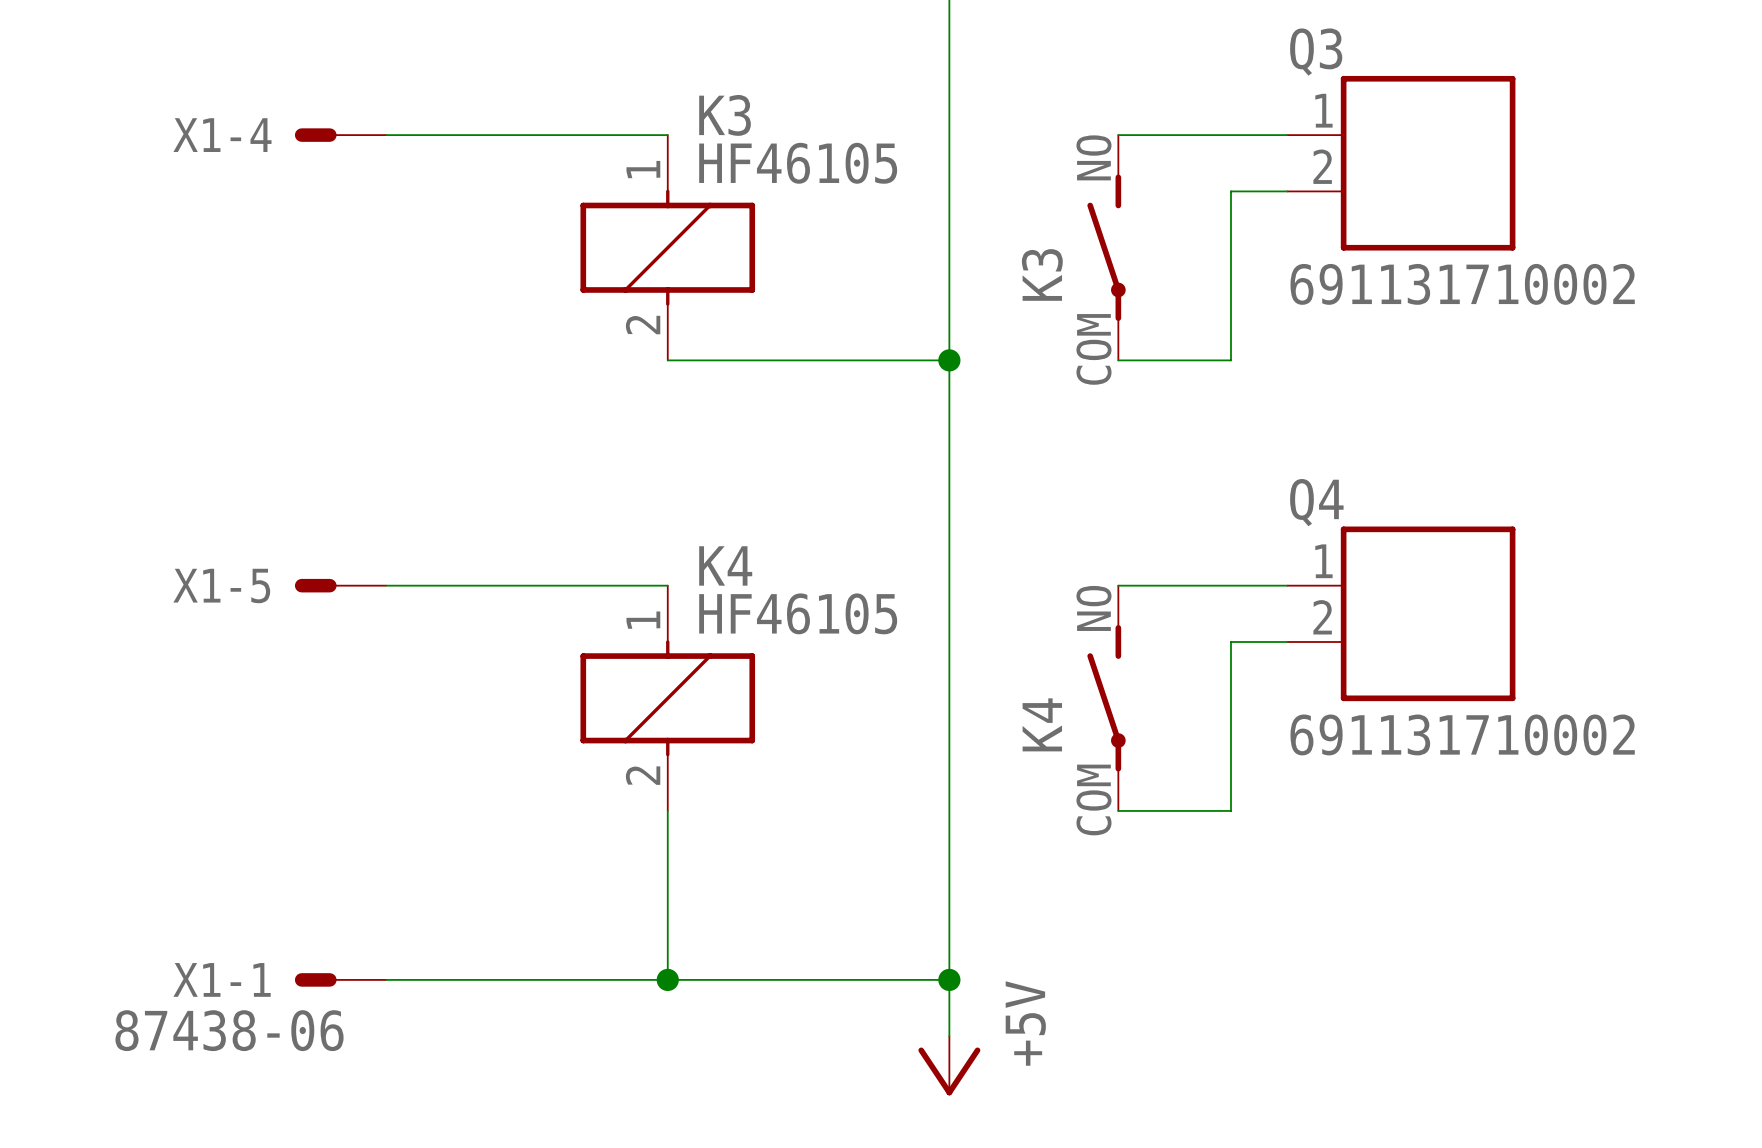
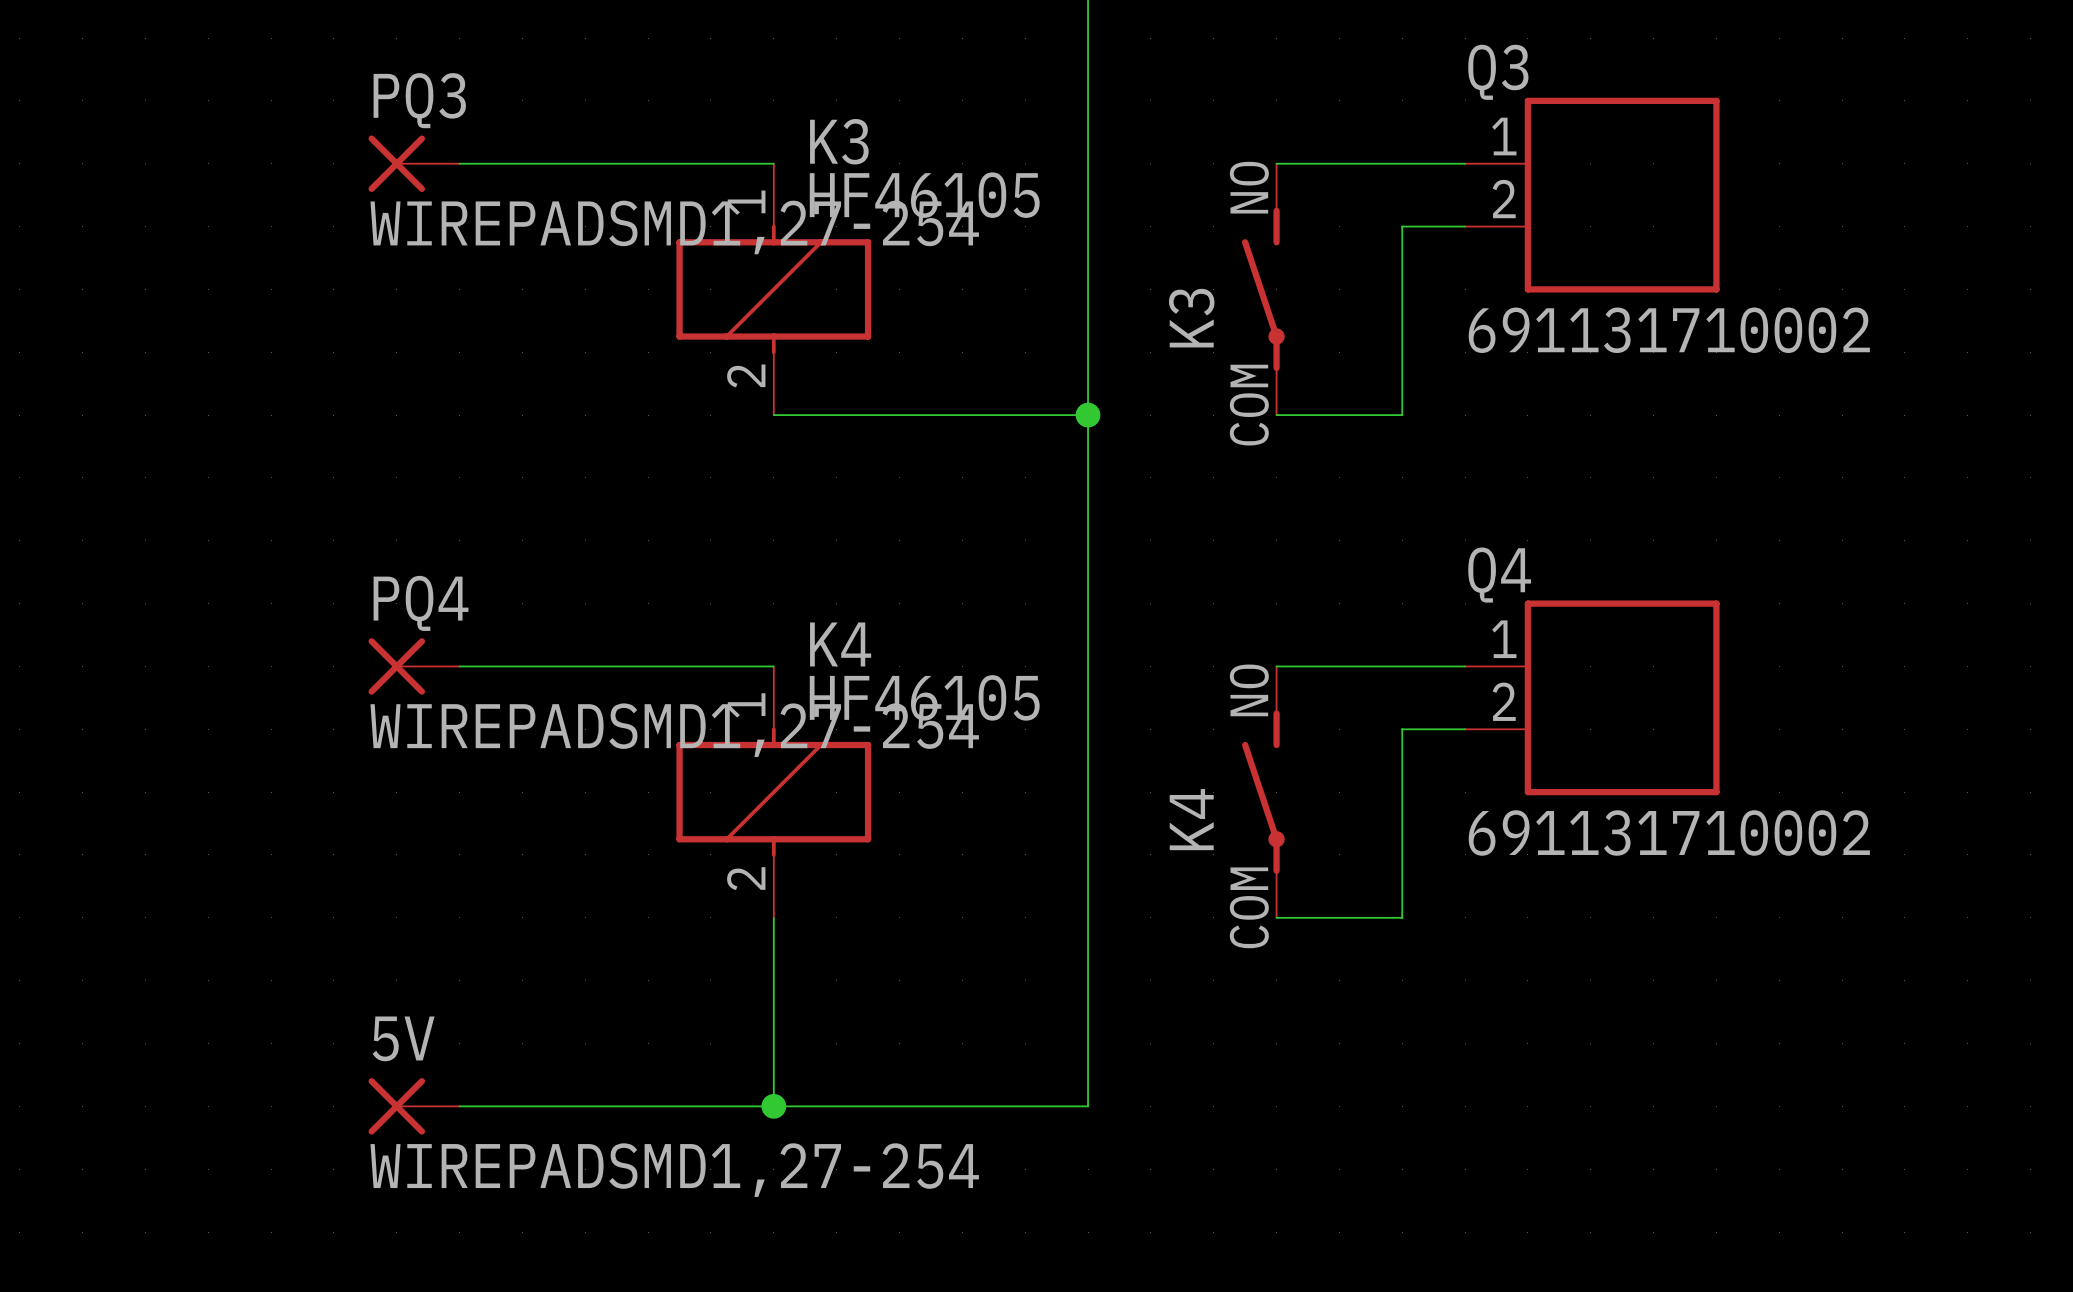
X1-4: (340, 135) -> none
PQ3: none -> WIREPADSMD1,27-254 (414, 163)
X1-5: (340, 585) -> none
PQ4: none -> WIREPADSMD1,27-254 (414, 666)
X1-1: 87438-06 (340, 979) -> none
5V: none -> WIREPADSMD1,27-254 (414, 1106)
wire: (949, 979) (949, 1036) -> none
junction: (949, 979) -> none
power symbol: +5V (949, 1065) -> none

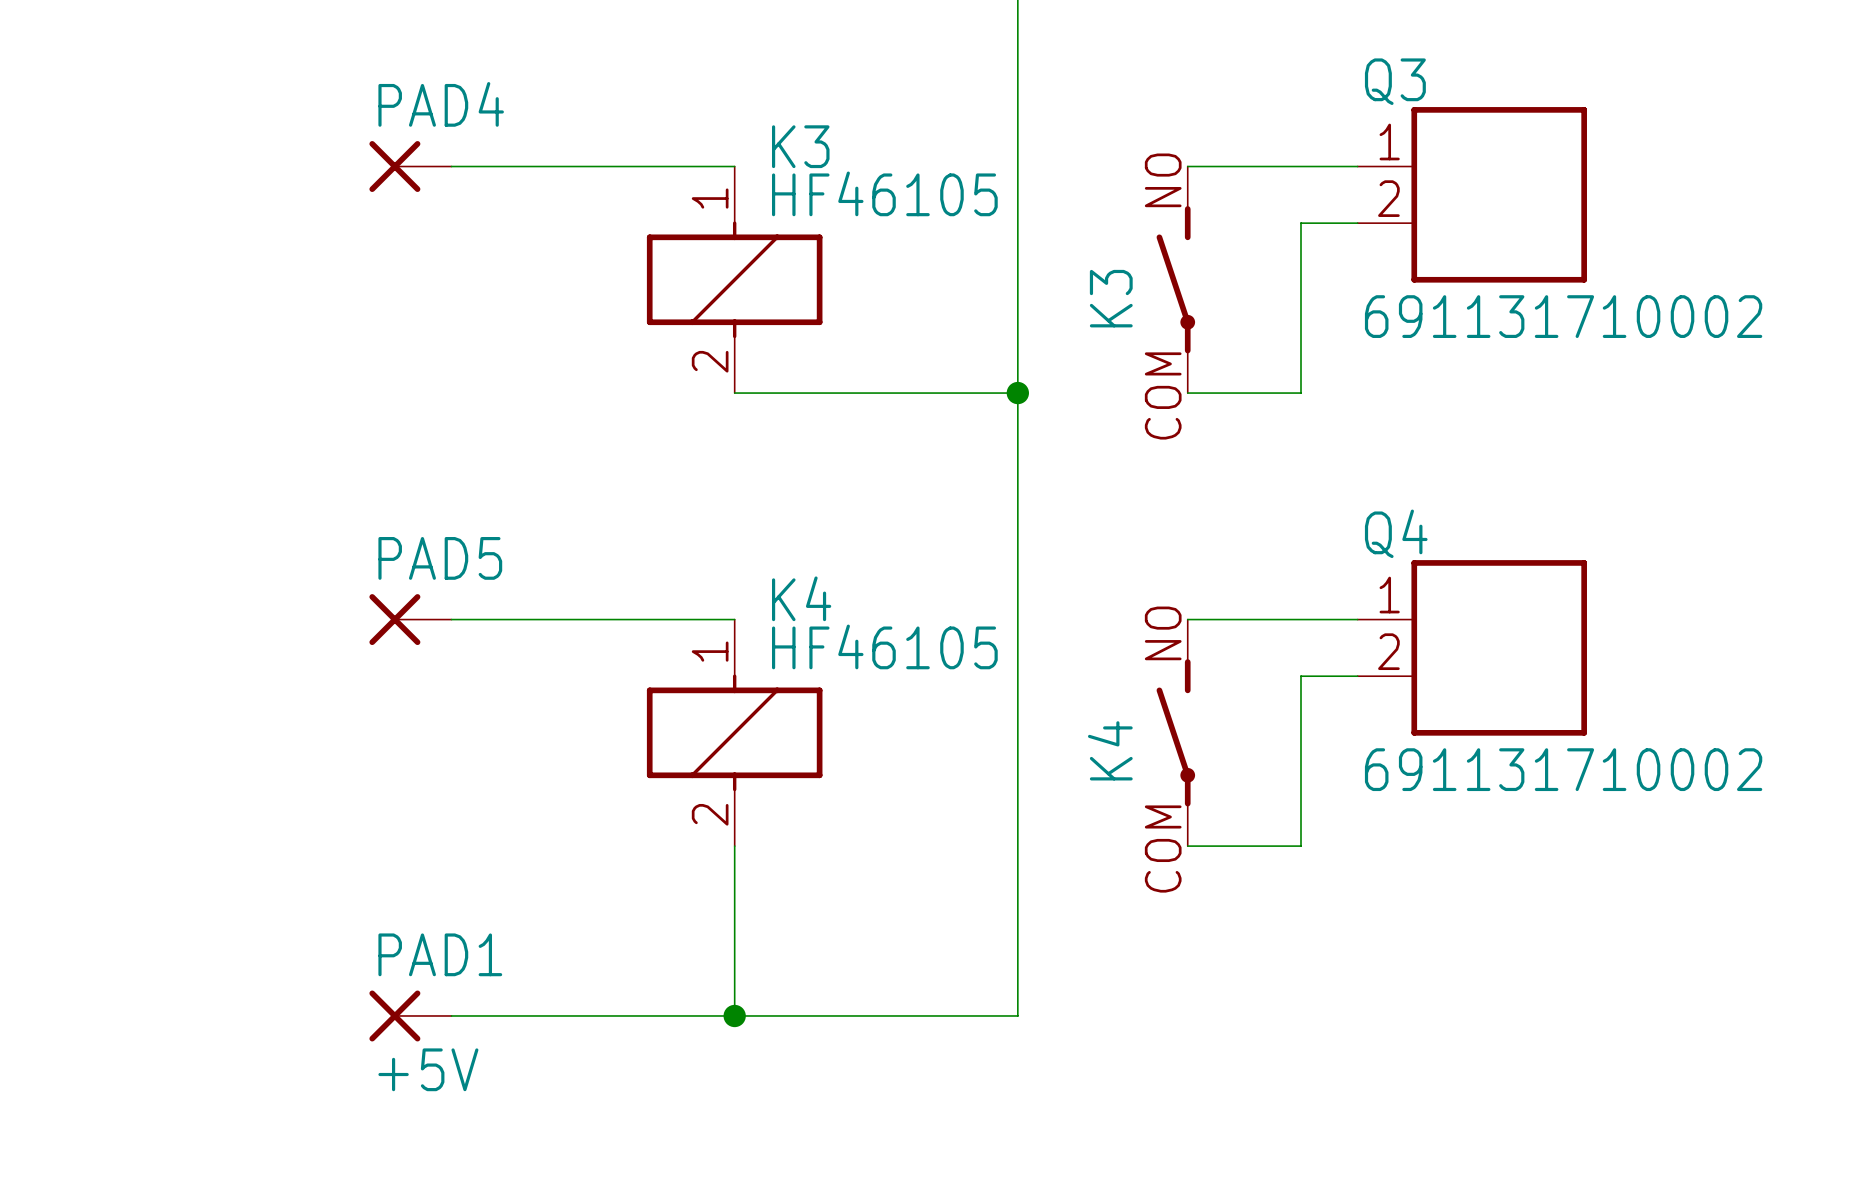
PQ3 name: PQ3 (419, 100) -> PAD4 (441, 104)
PQ3 value: WIREPADSMD1,27-254 (674, 227) -> none
PQ4 name: PQ4 (421, 603) -> PAD5 (440, 558)
PQ4 value: WIREPADSMD1,27-254 (674, 730) -> none
5V name: 5V (403, 1038) -> PAD1 (440, 954)
5V value: WIREPADSMD1,27-254 (674, 1170) -> +5V (428, 1069)

